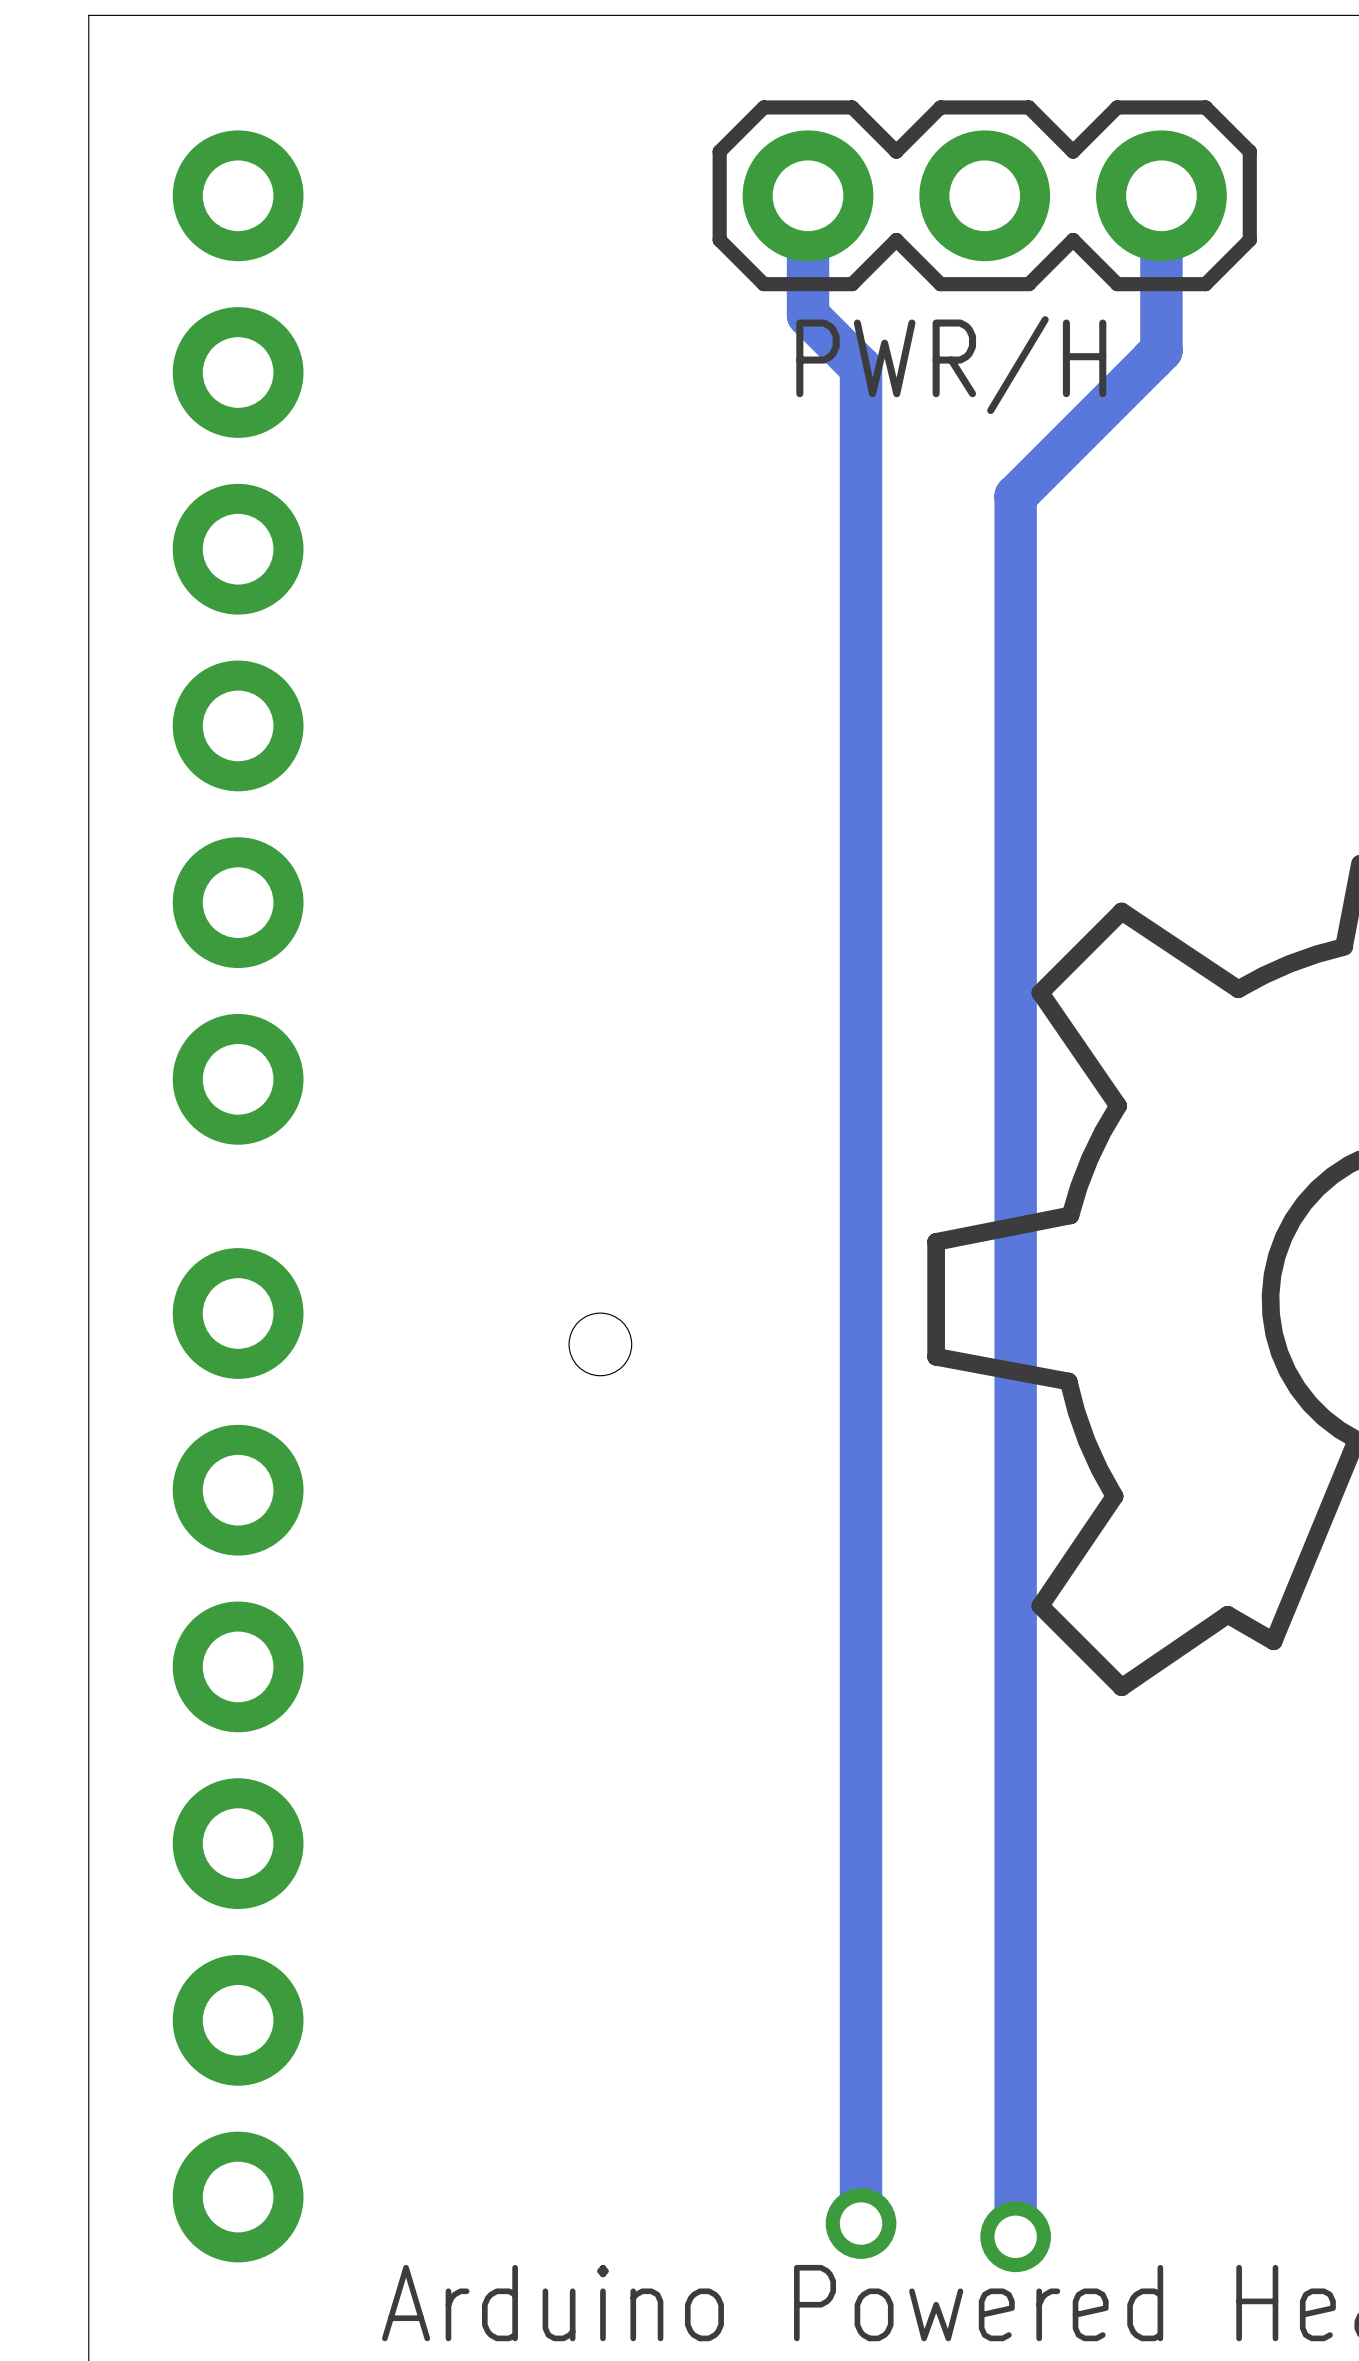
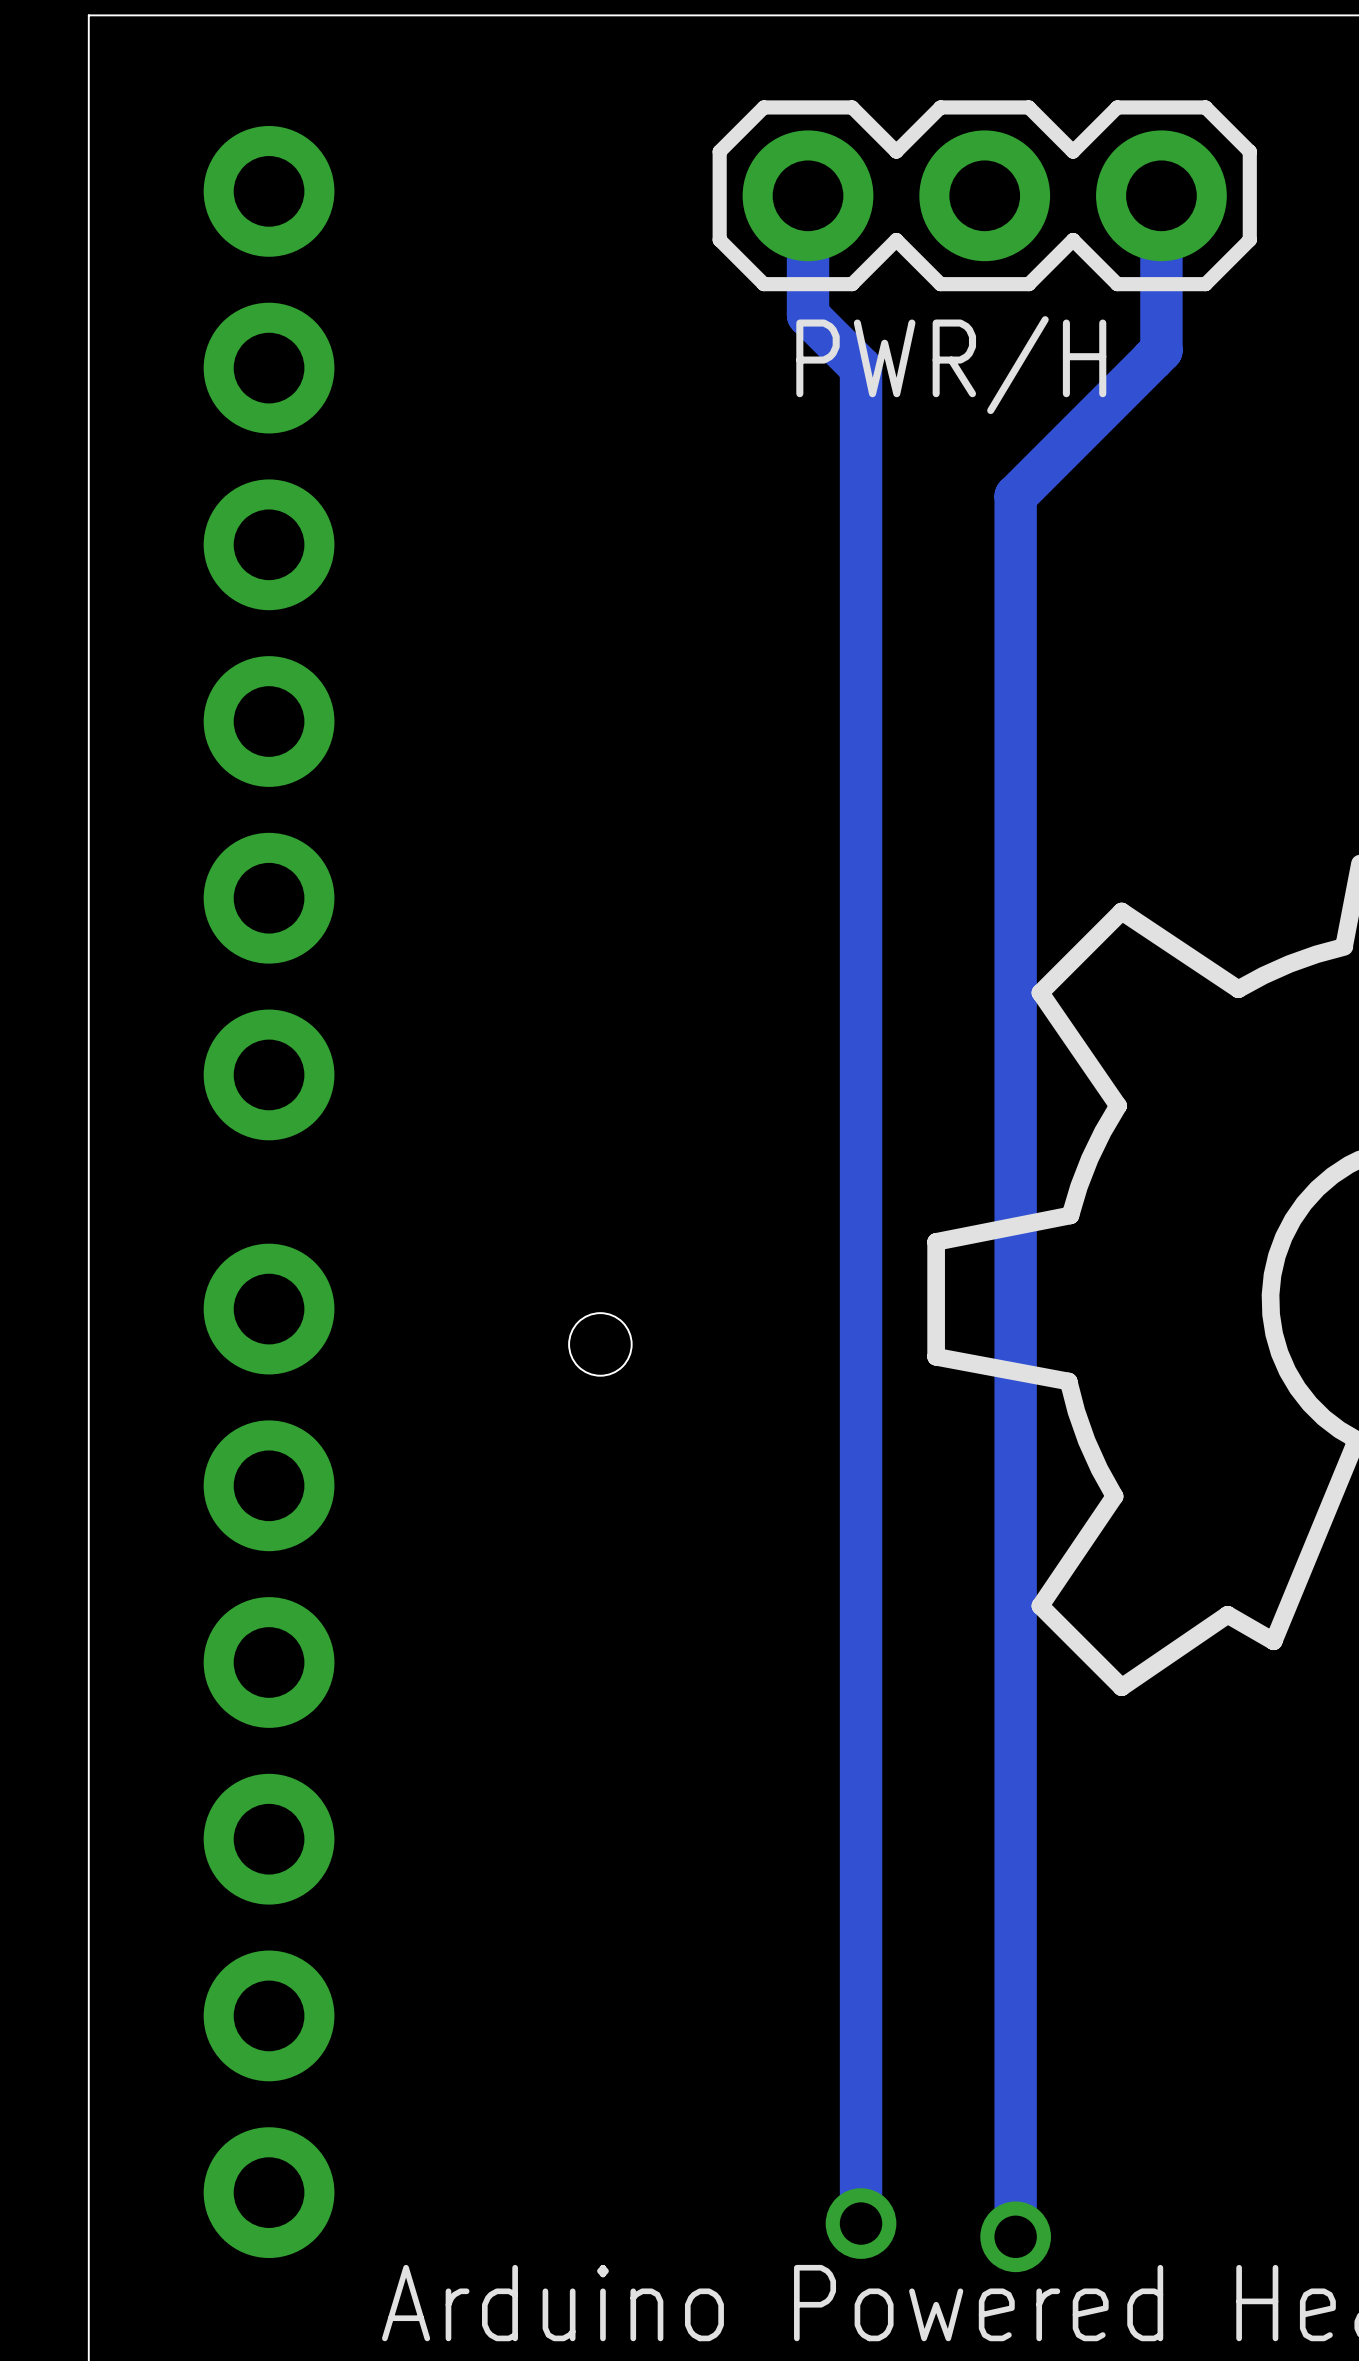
part position: (238, 637) -> (269, 633)
part position: (238, 1755) -> (269, 1750)

